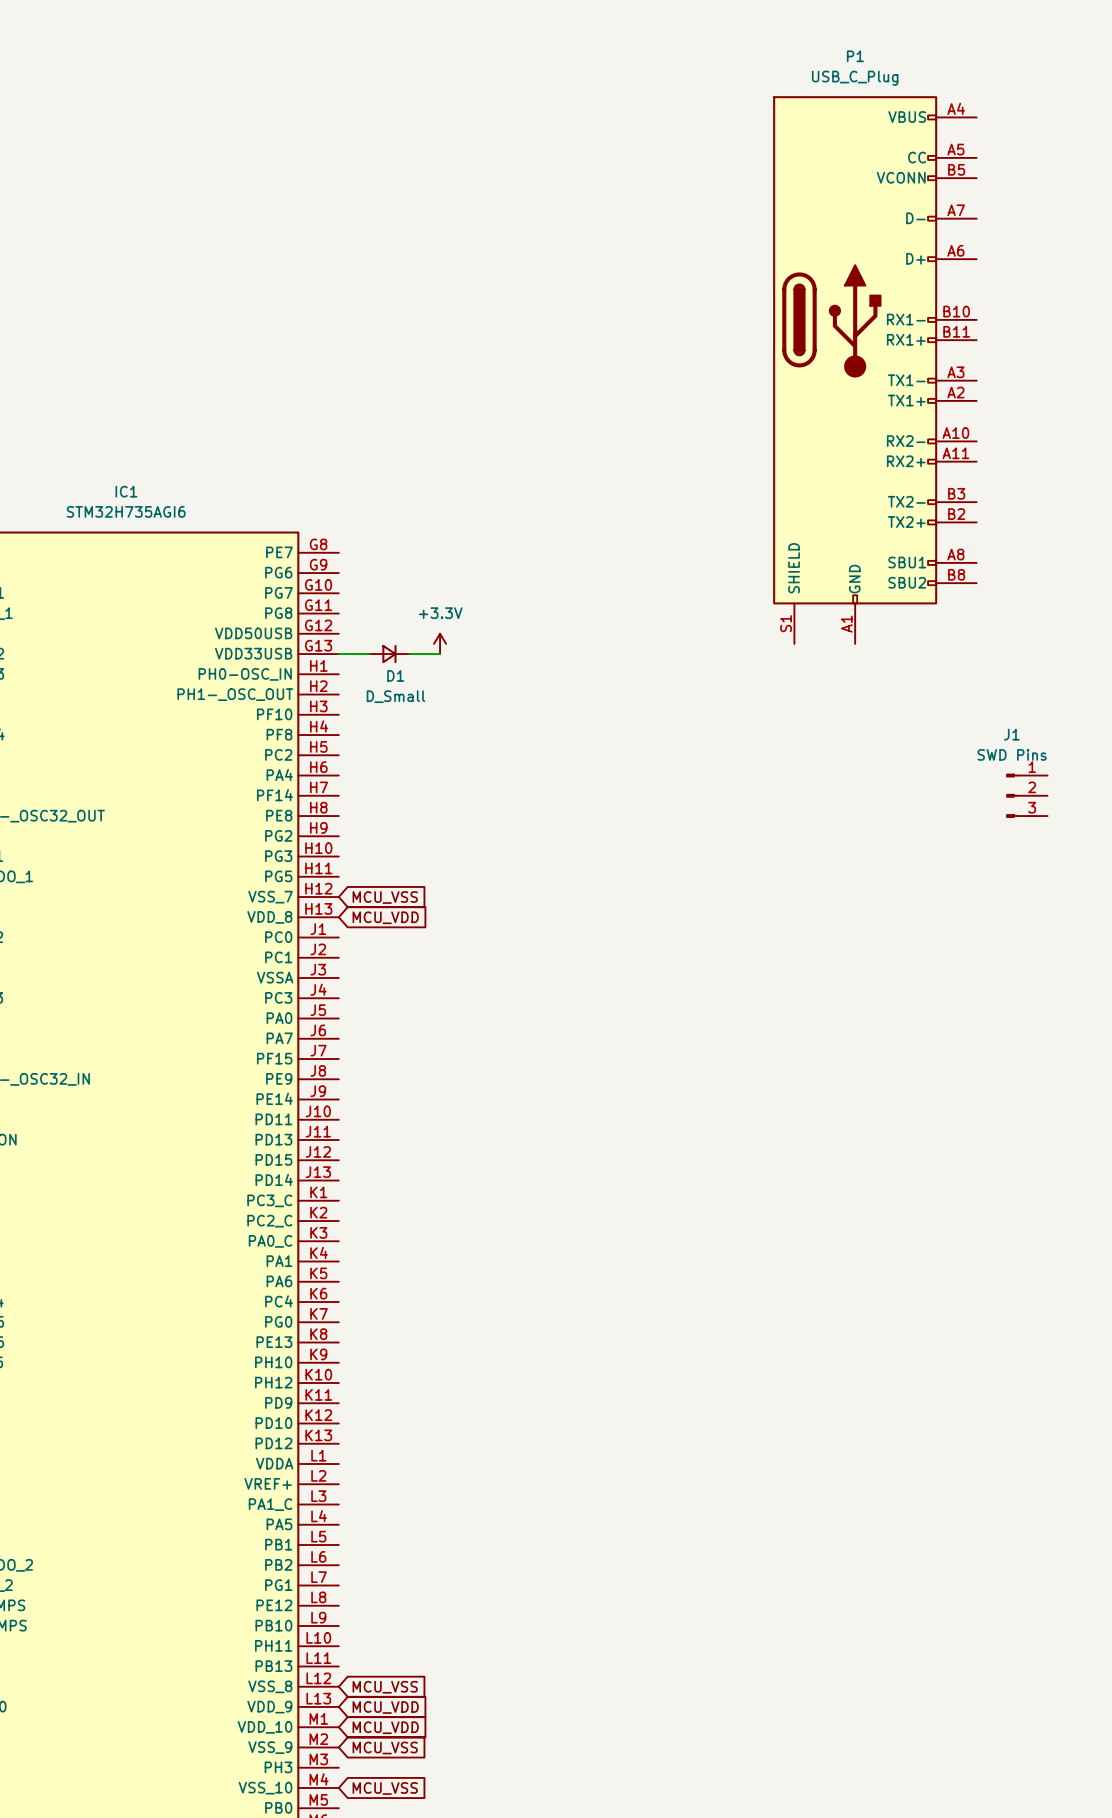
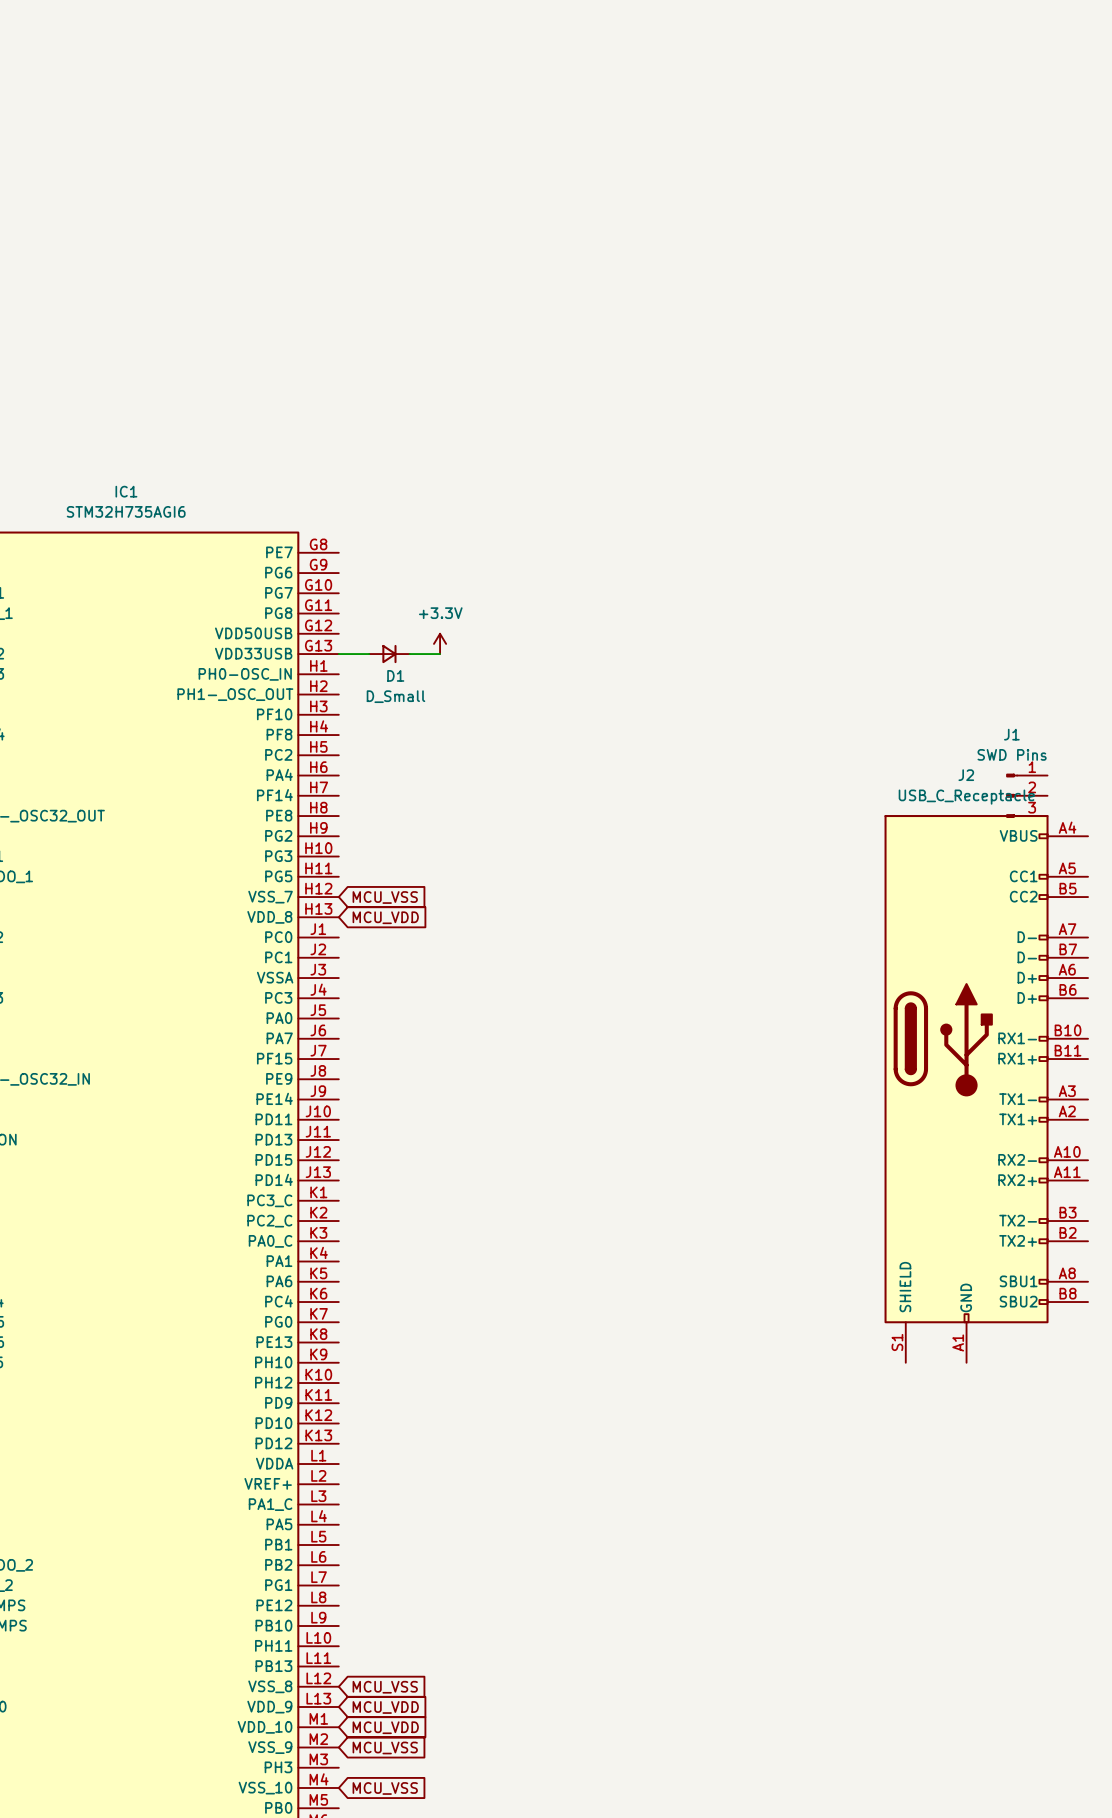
P1: USB_C_Plug (874, 370) -> none
J2: none -> USB_C_Receptacle (986, 1088)

